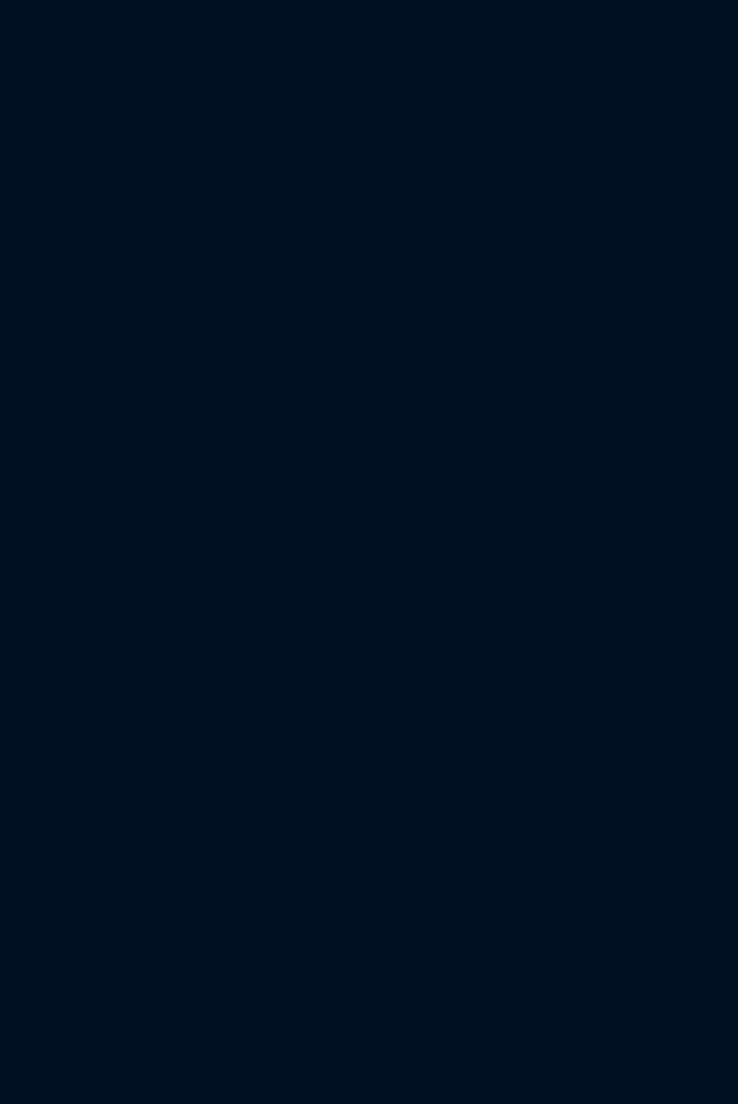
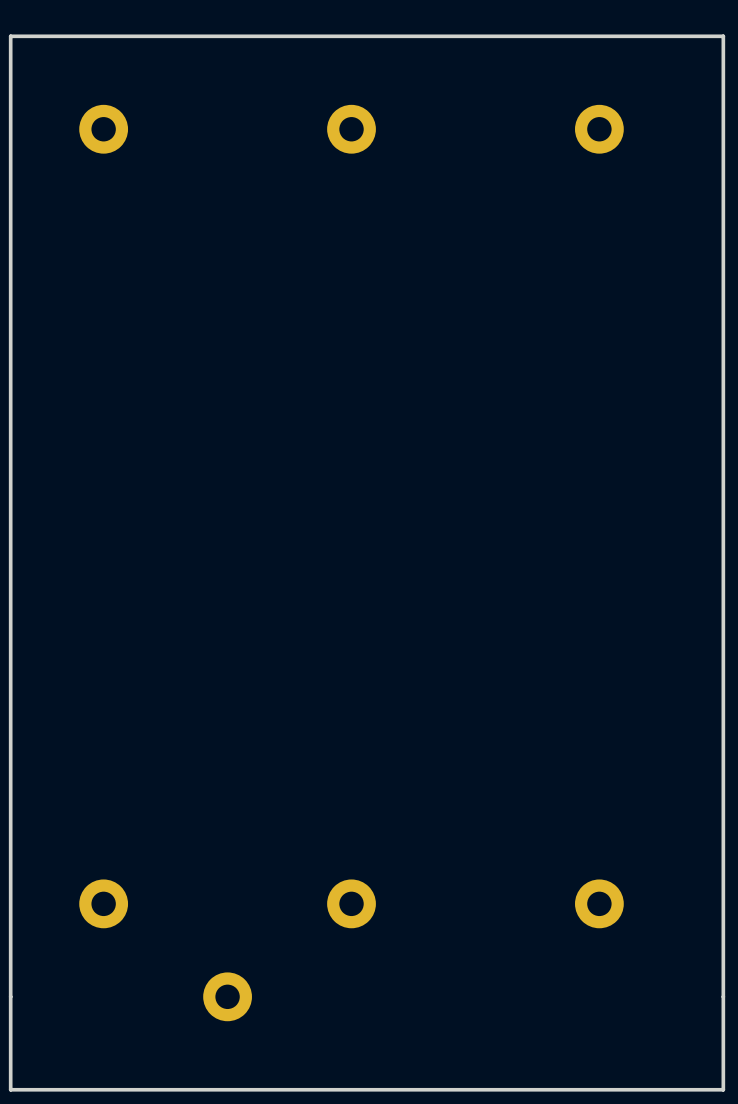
board edge: none -> (723, 36) (723, 1089) (10, 1089) (10, 36) (723, 36)
part: none -> (103, 129)
part: none -> (351, 129)
part: none -> (599, 129)
part: none -> (103, 903)
part: none -> (351, 903)
part: none -> (599, 903)
part: none -> (227, 996)

